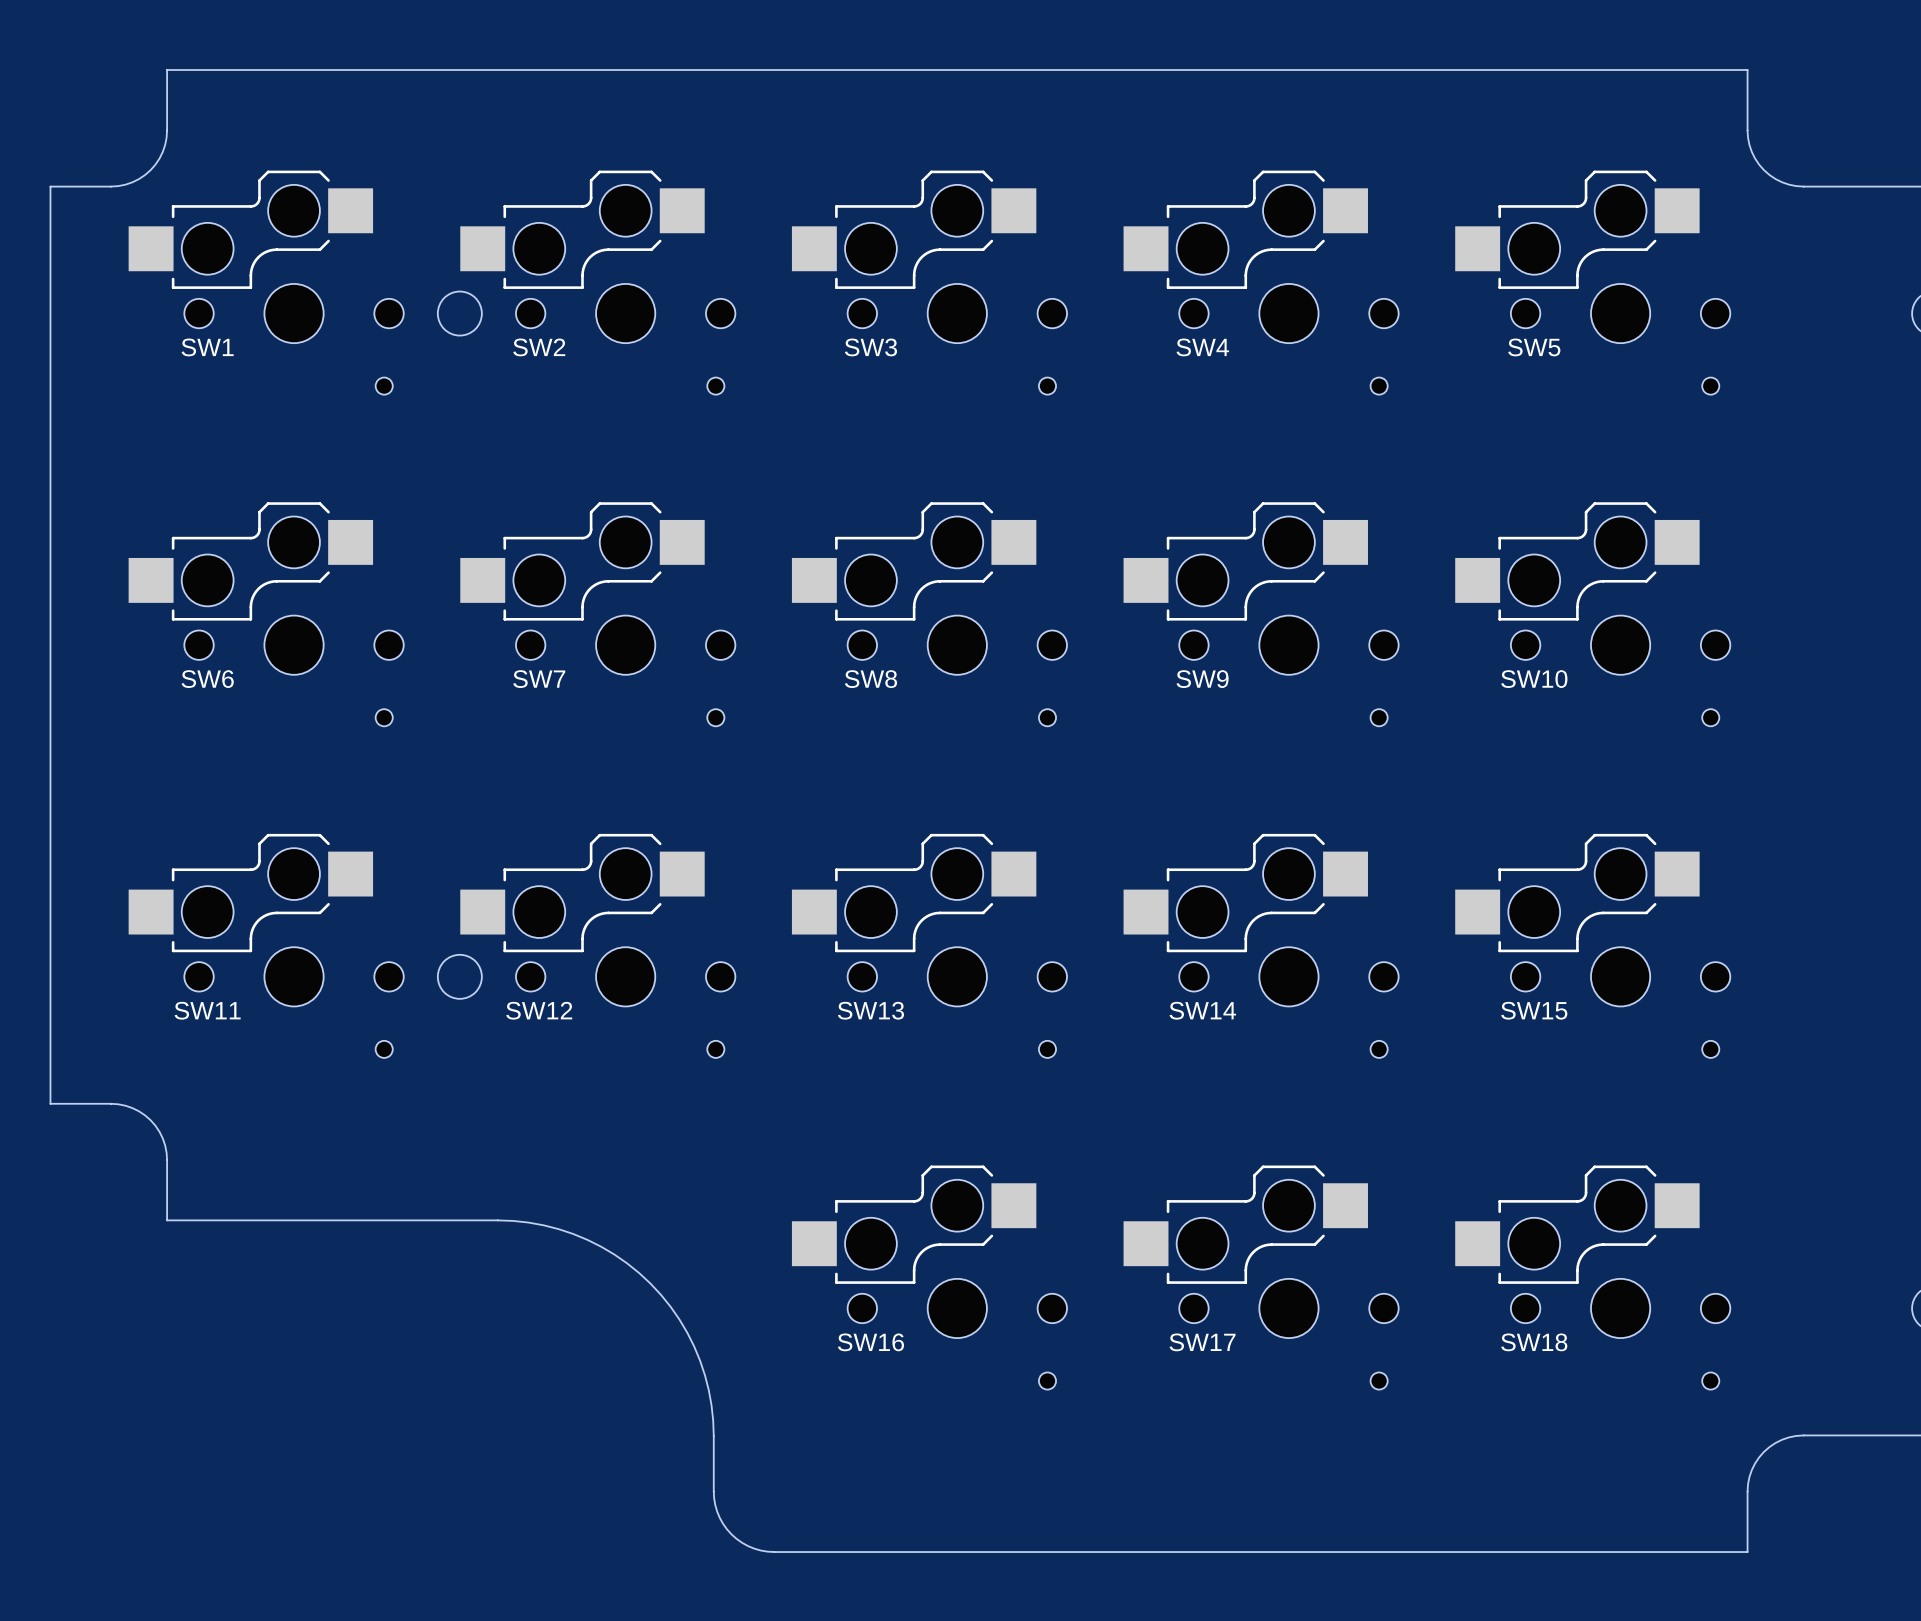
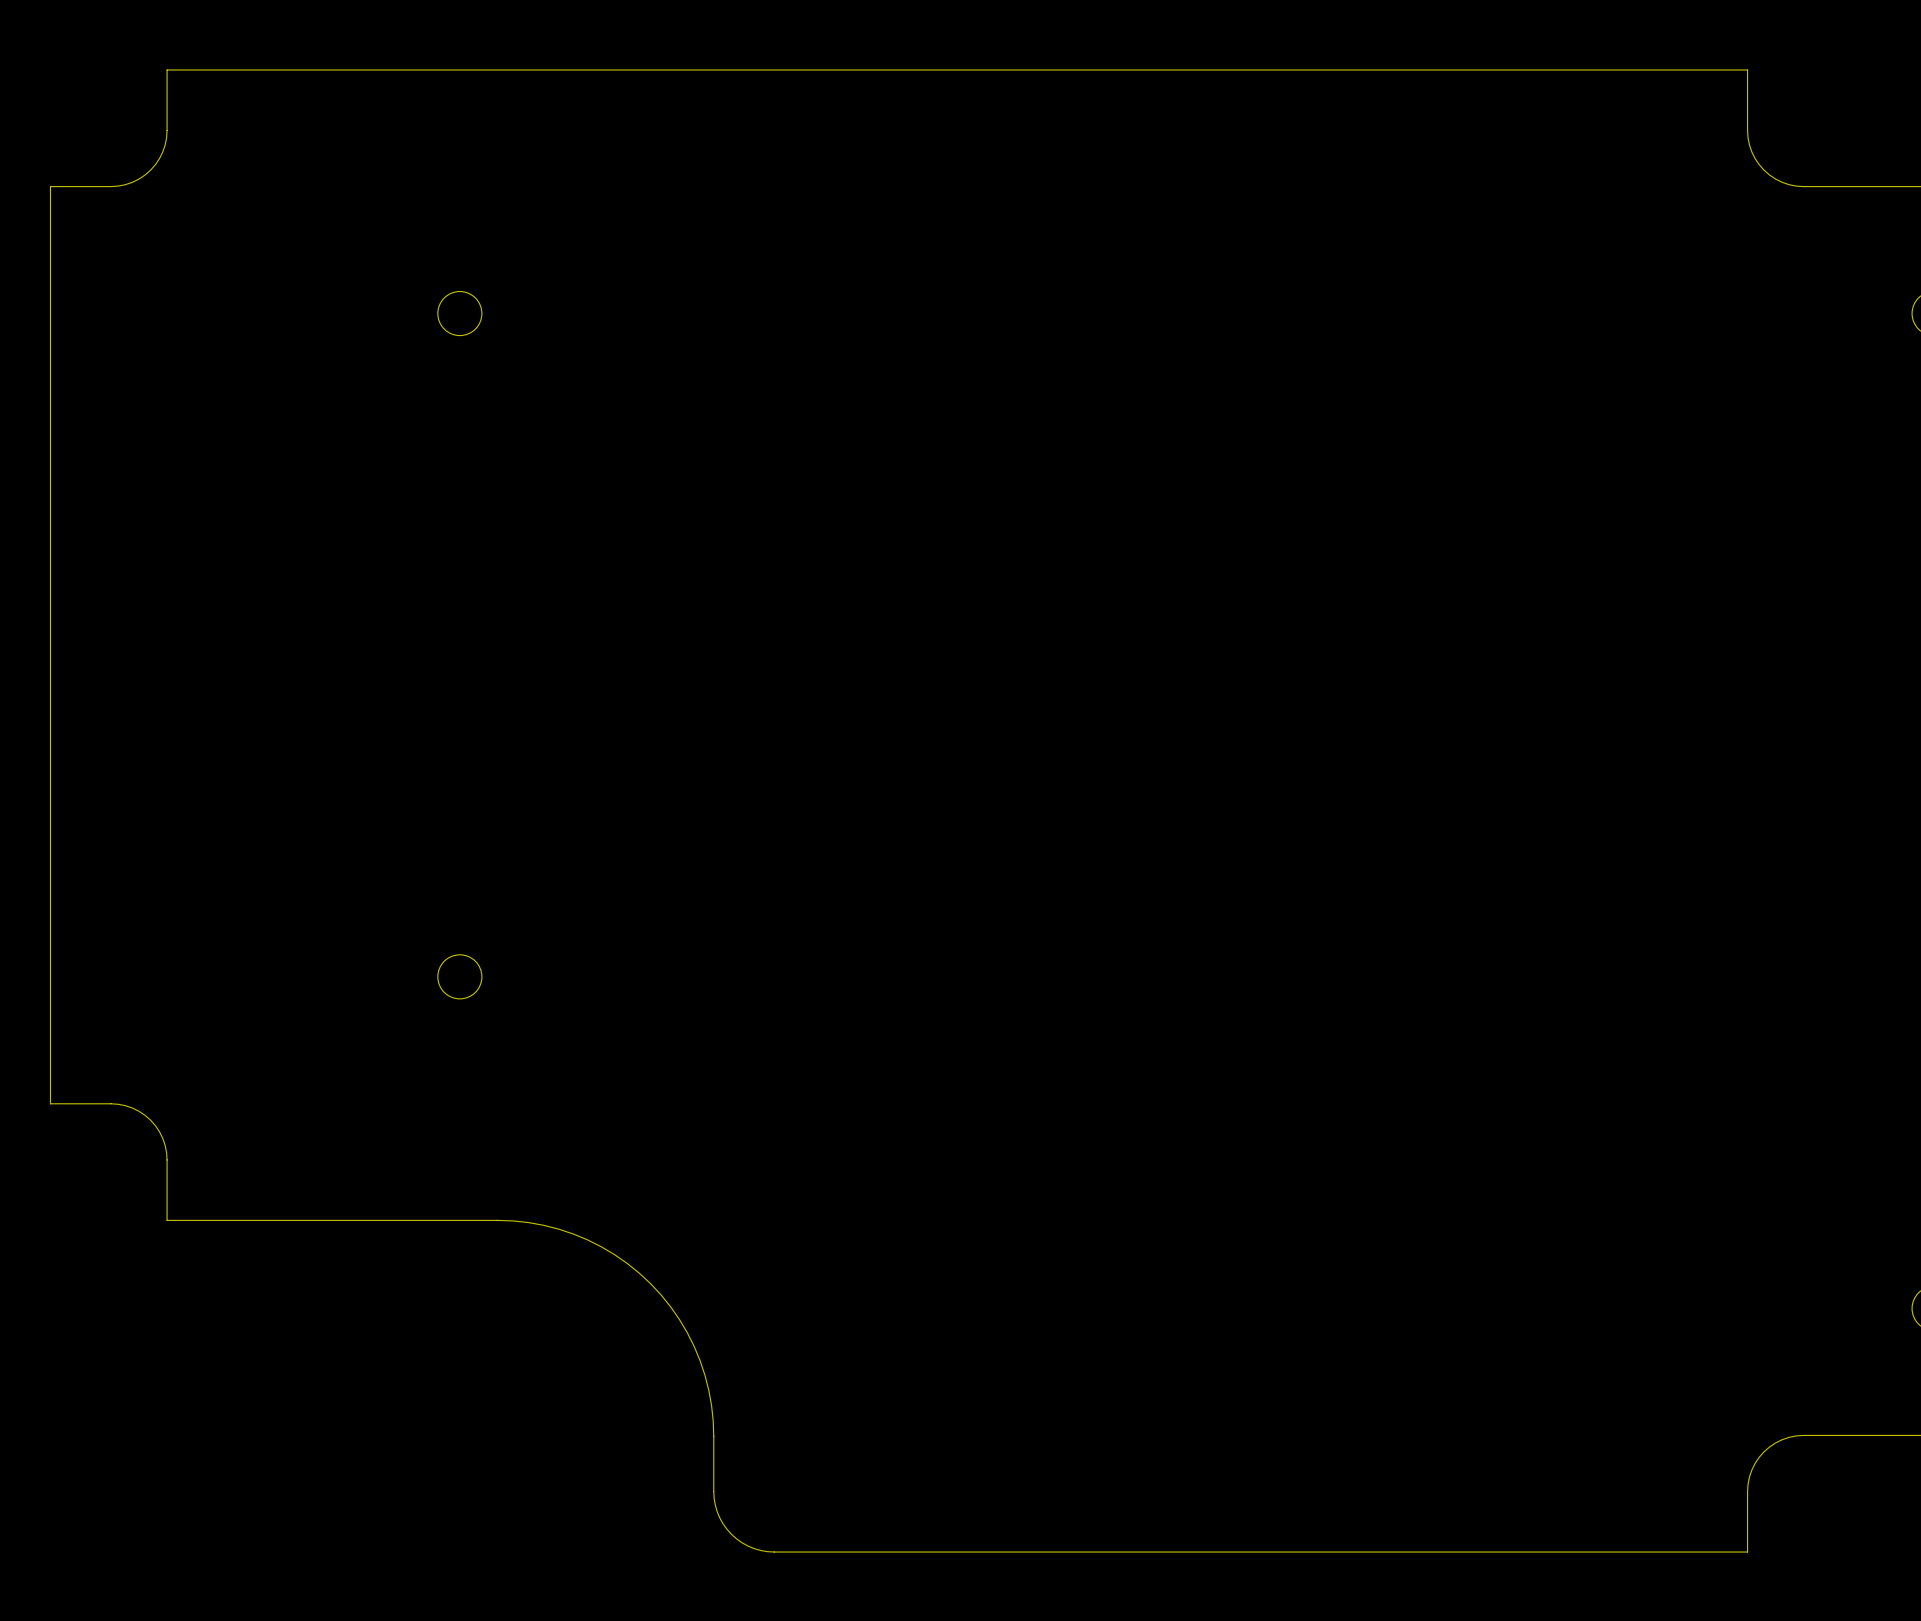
SW1: (266, 282) -> none
SW2: (597, 282) -> none
SW3: (929, 282) -> none
SW4: (1261, 282) -> none
SW5: (1592, 282) -> none
SW6: (266, 614) -> none
SW7: (597, 614) -> none
SW8: (929, 614) -> none
SW9: (1261, 614) -> none
SW10: (1592, 614) -> none
SW11: (266, 945) -> none
SW12: (597, 945) -> none
SW13: (929, 945) -> none
SW14: (1261, 945) -> none
SW15: (1592, 945) -> none
SW16: (929, 1277) -> none
SW17: (1261, 1277) -> none
SW18: (1592, 1277) -> none

